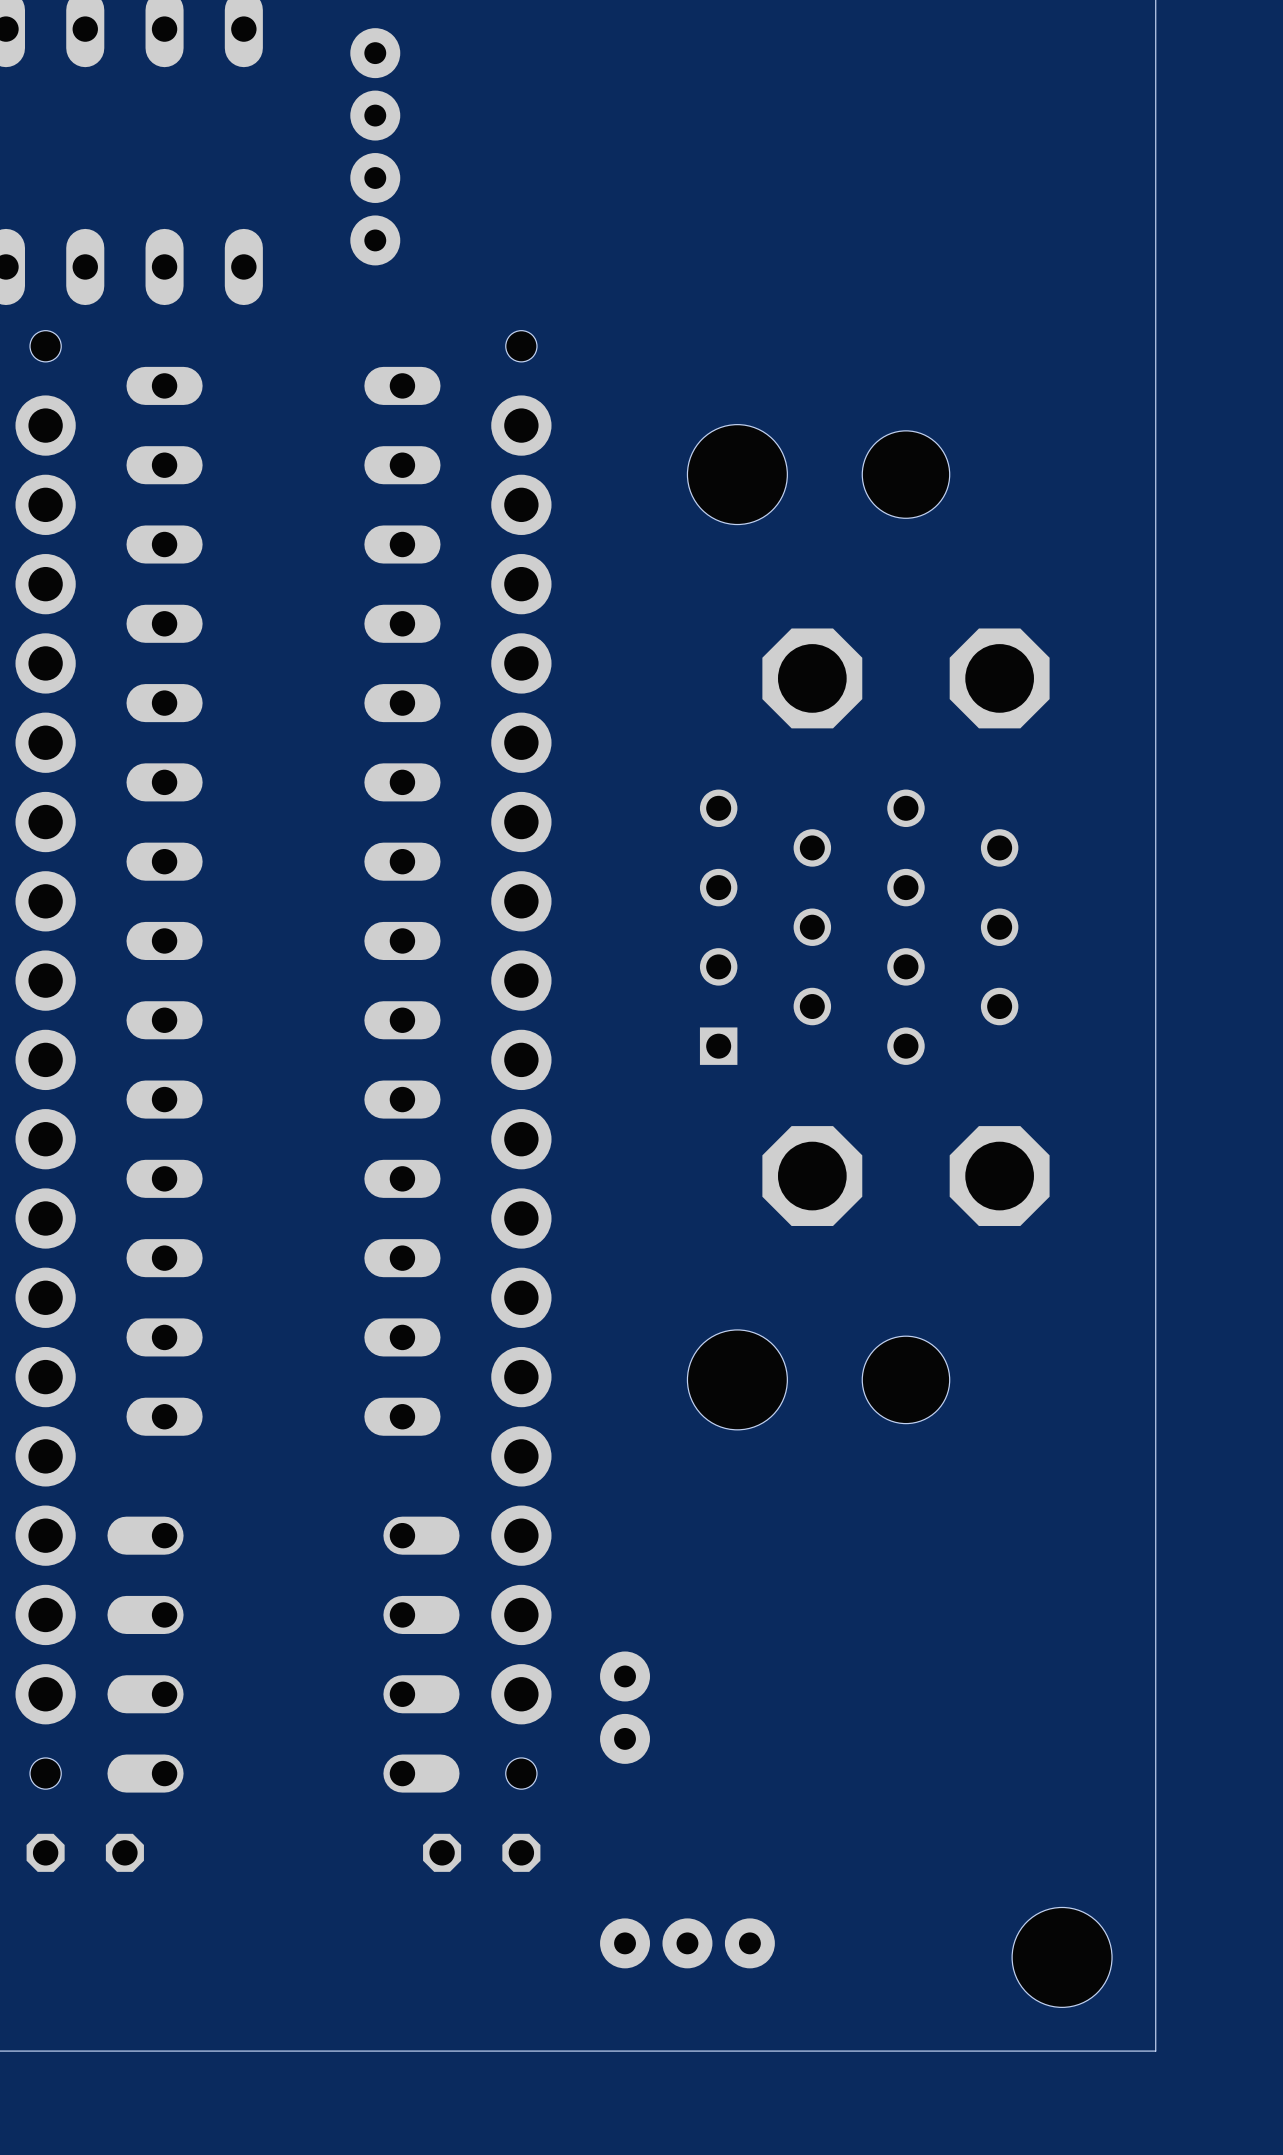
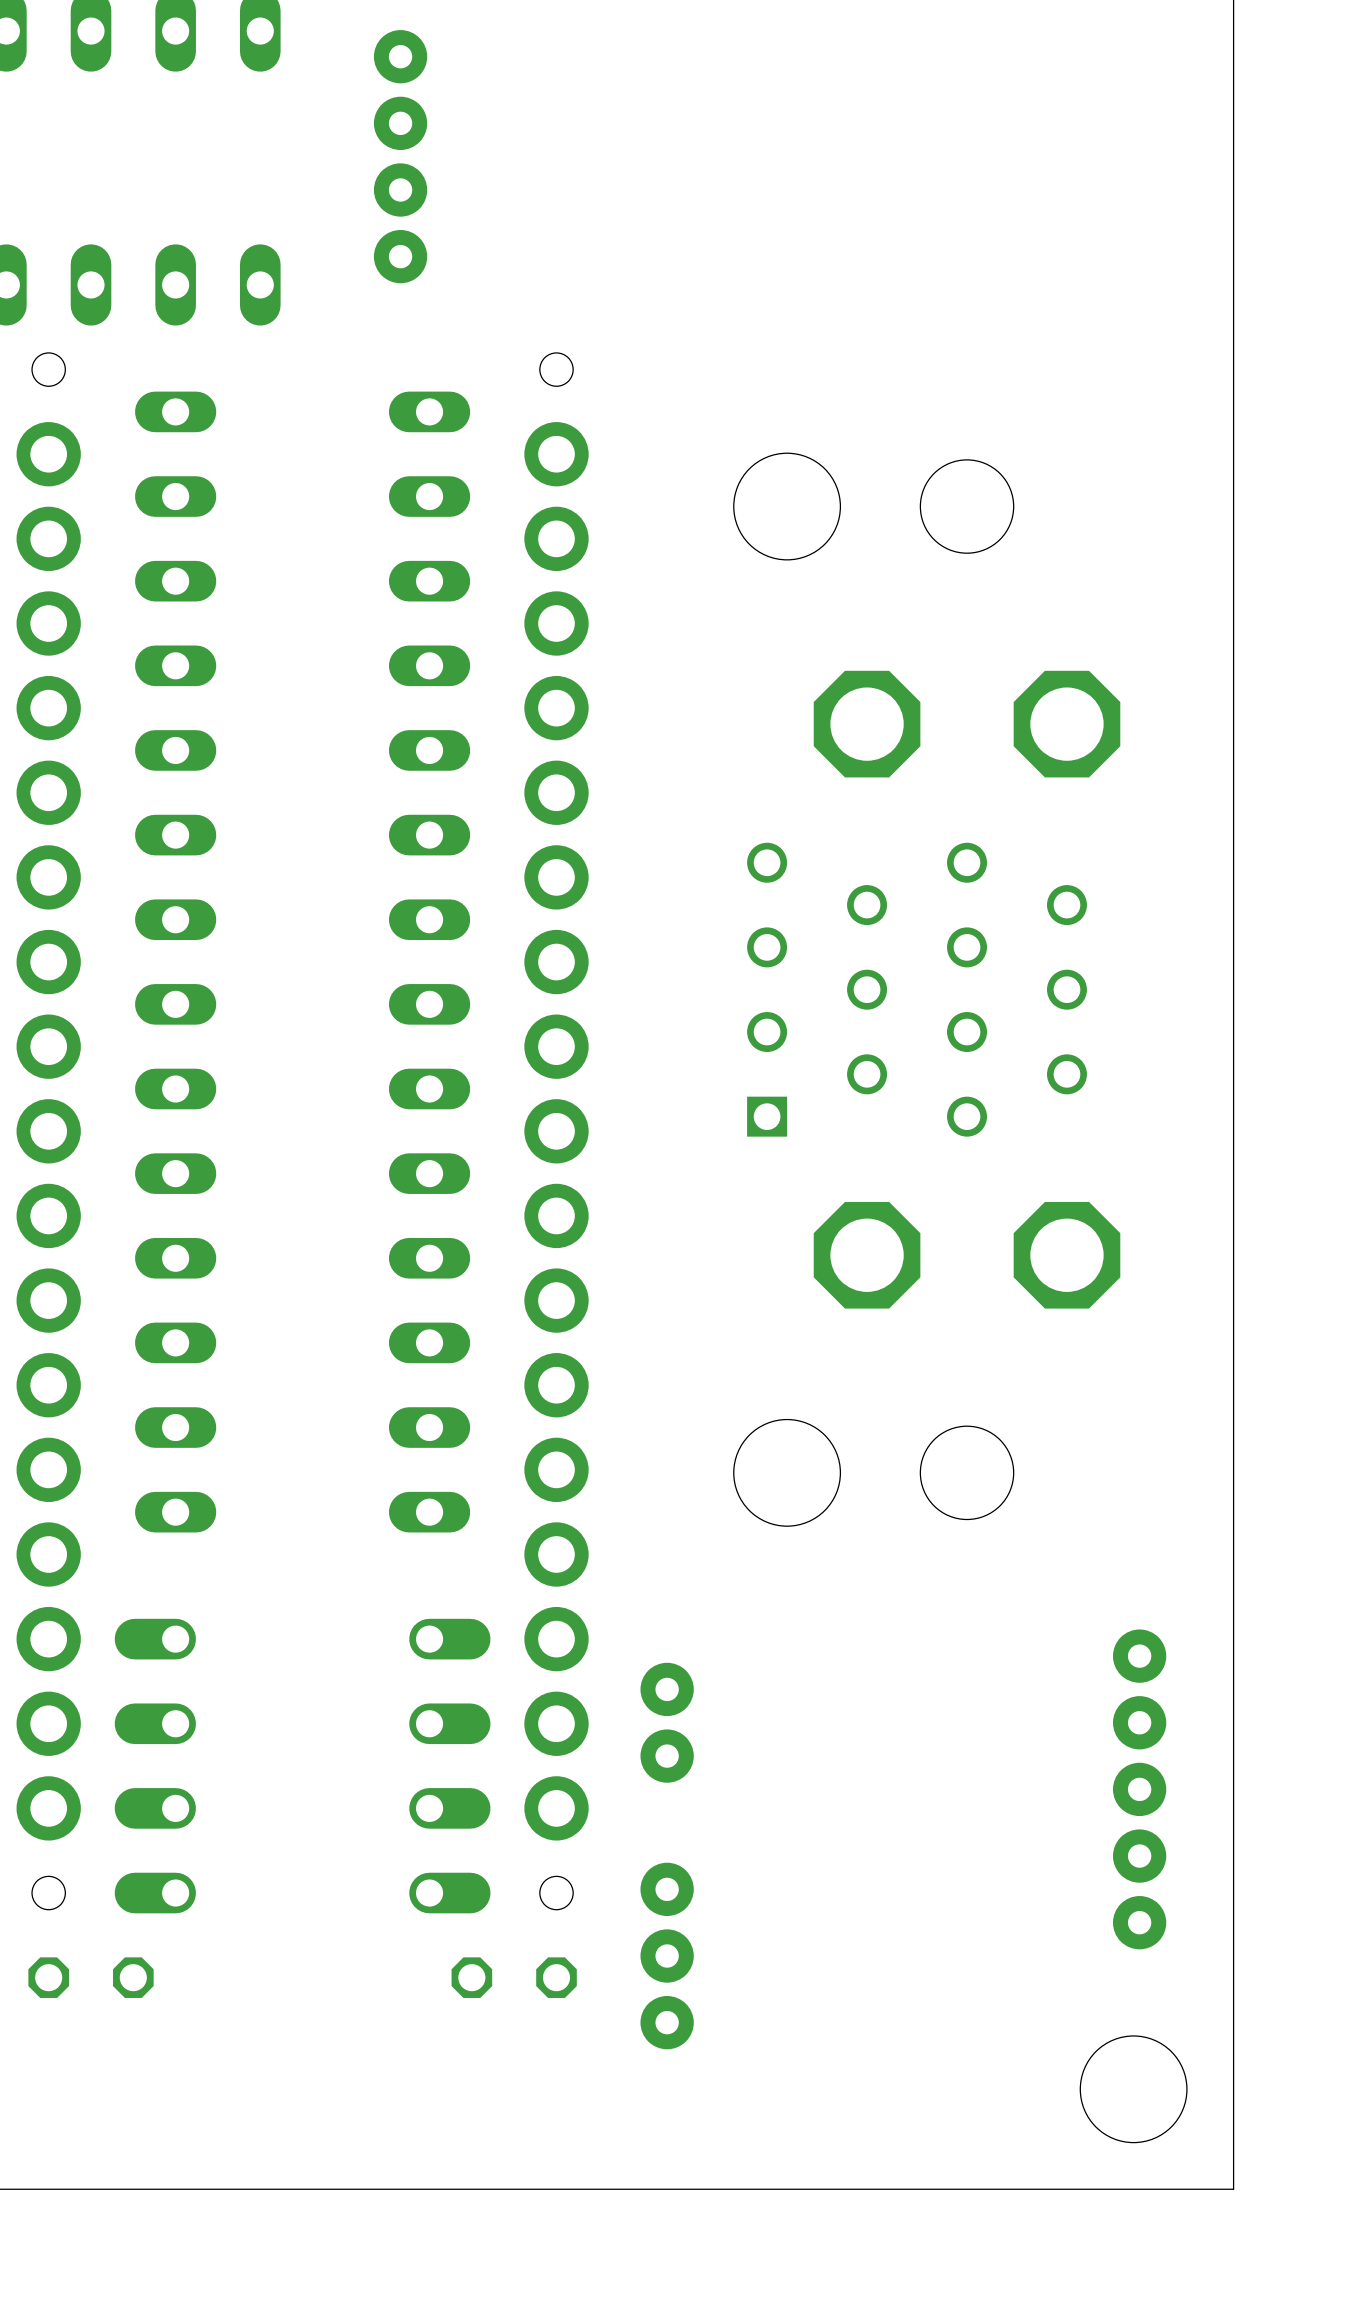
part: none -> (1139, 1789)
part position: (625, 1707) -> (667, 1722)
part rotation: 0° (687, 1943) -> 90° clockwise (667, 1956)
part position: (687, 1943) -> (667, 1956)

